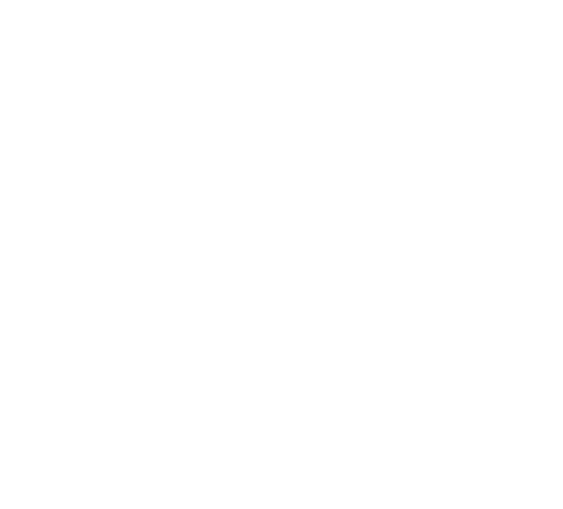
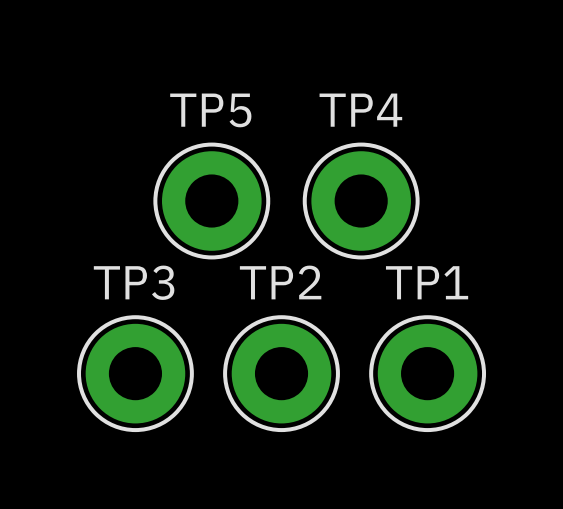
TP5: none -> (211, 201)
TP4: none -> (361, 201)
TP3: none -> (135, 373)
TP2: none -> (281, 373)
TP1: none -> (427, 373)

